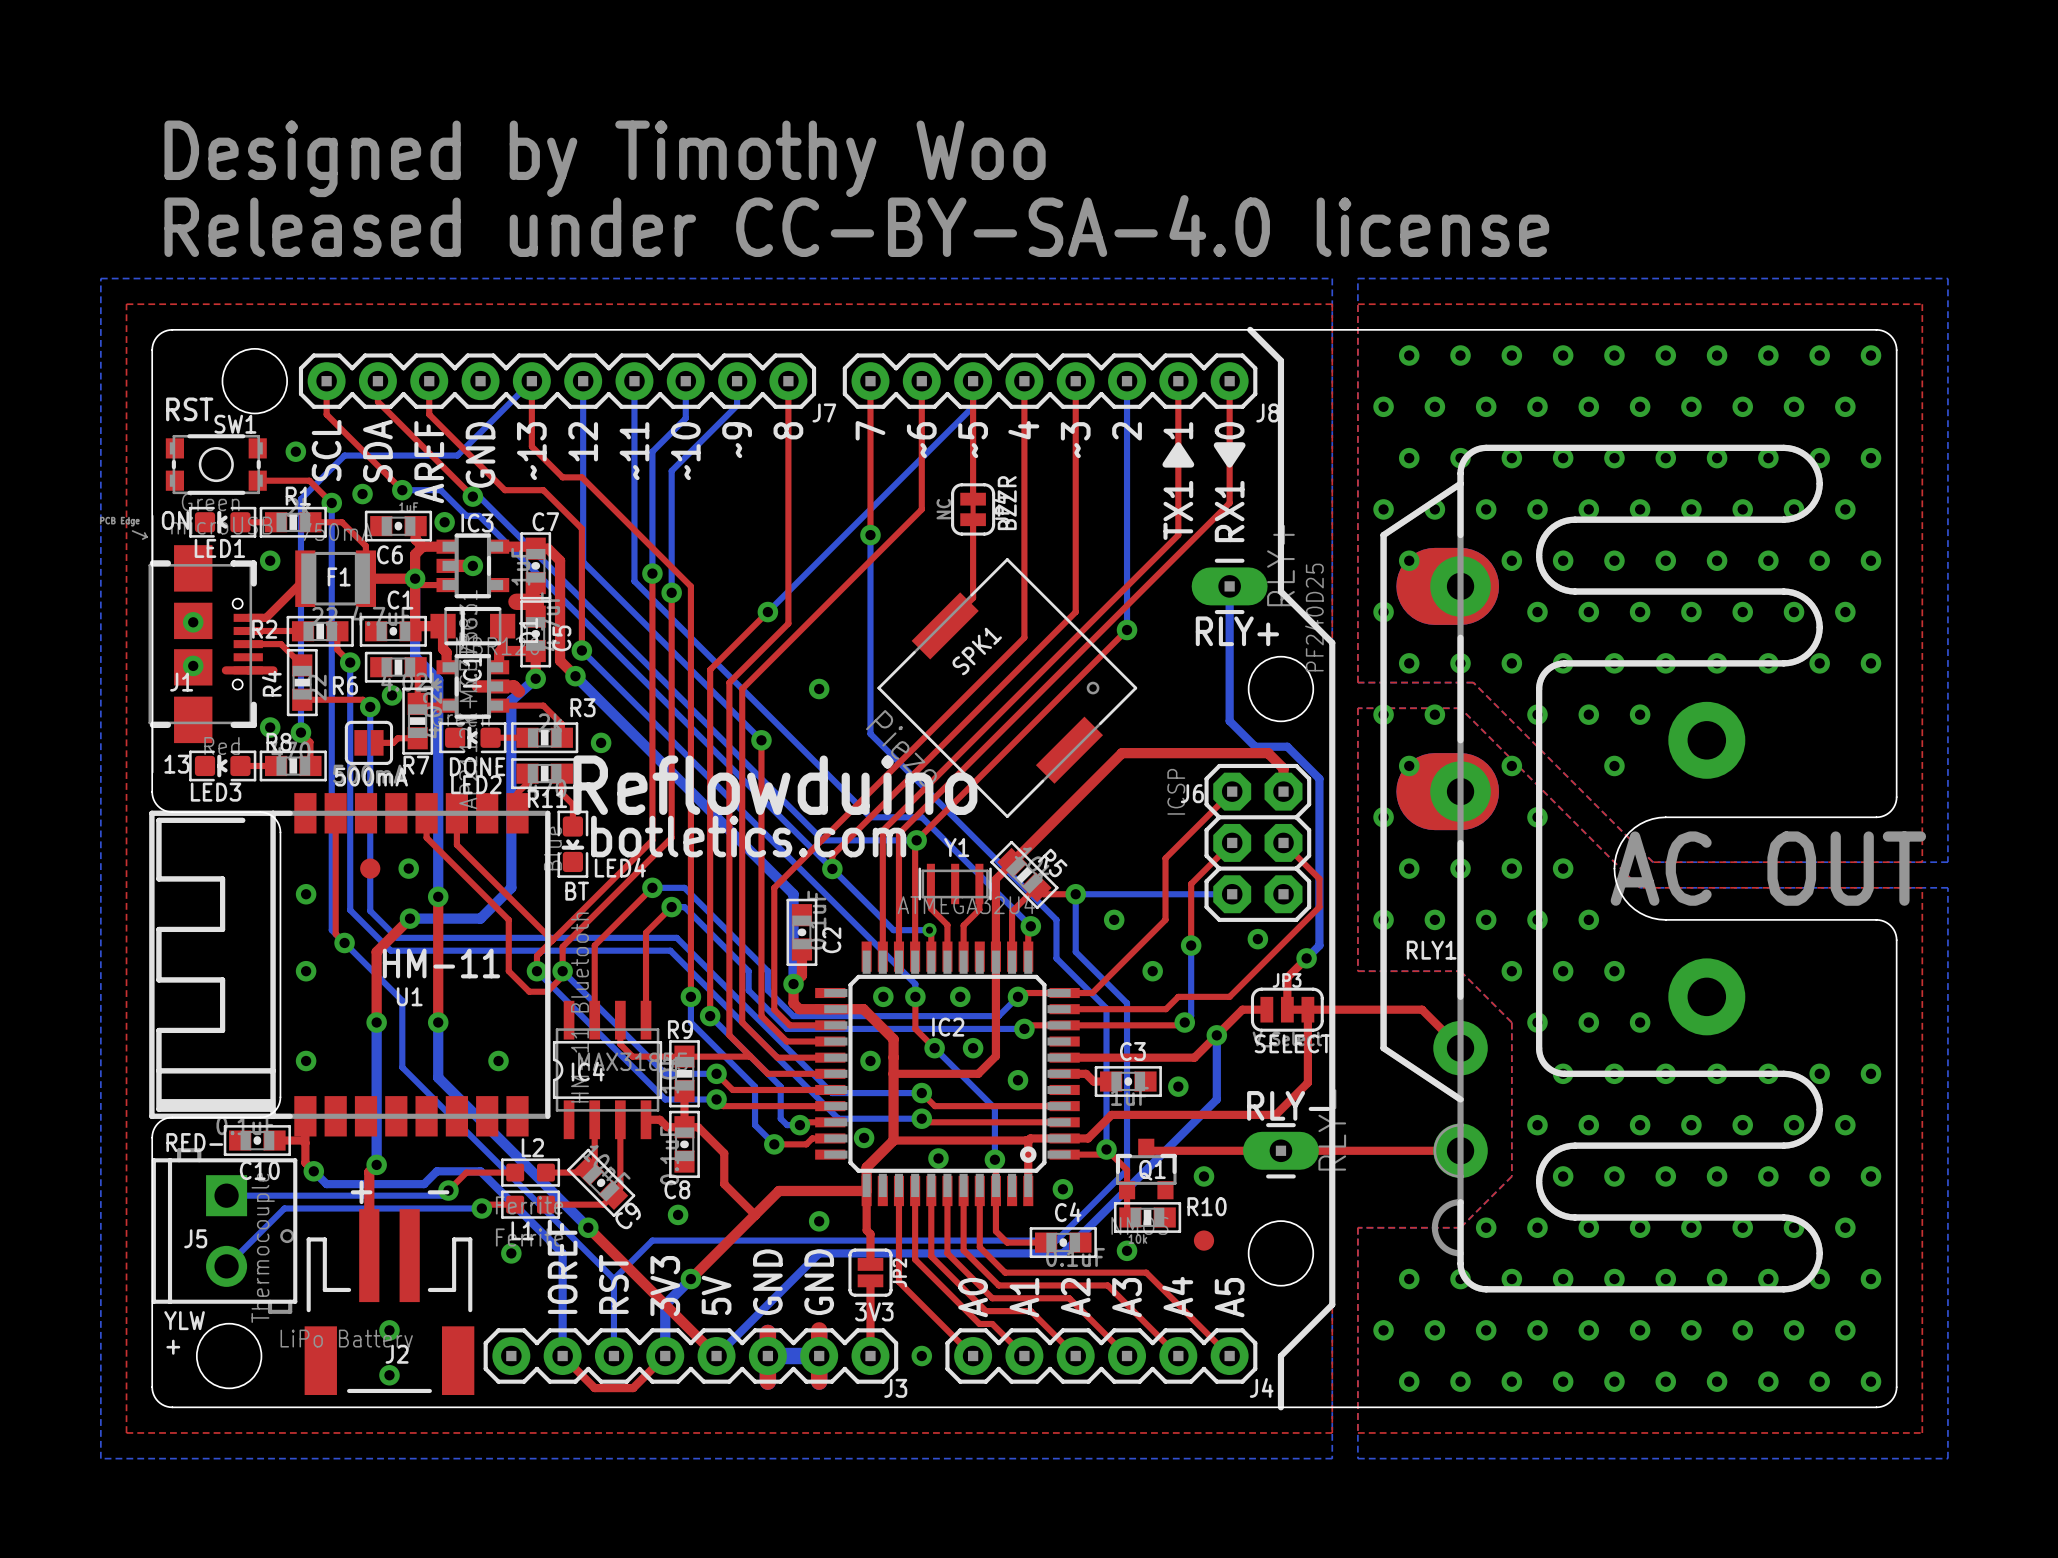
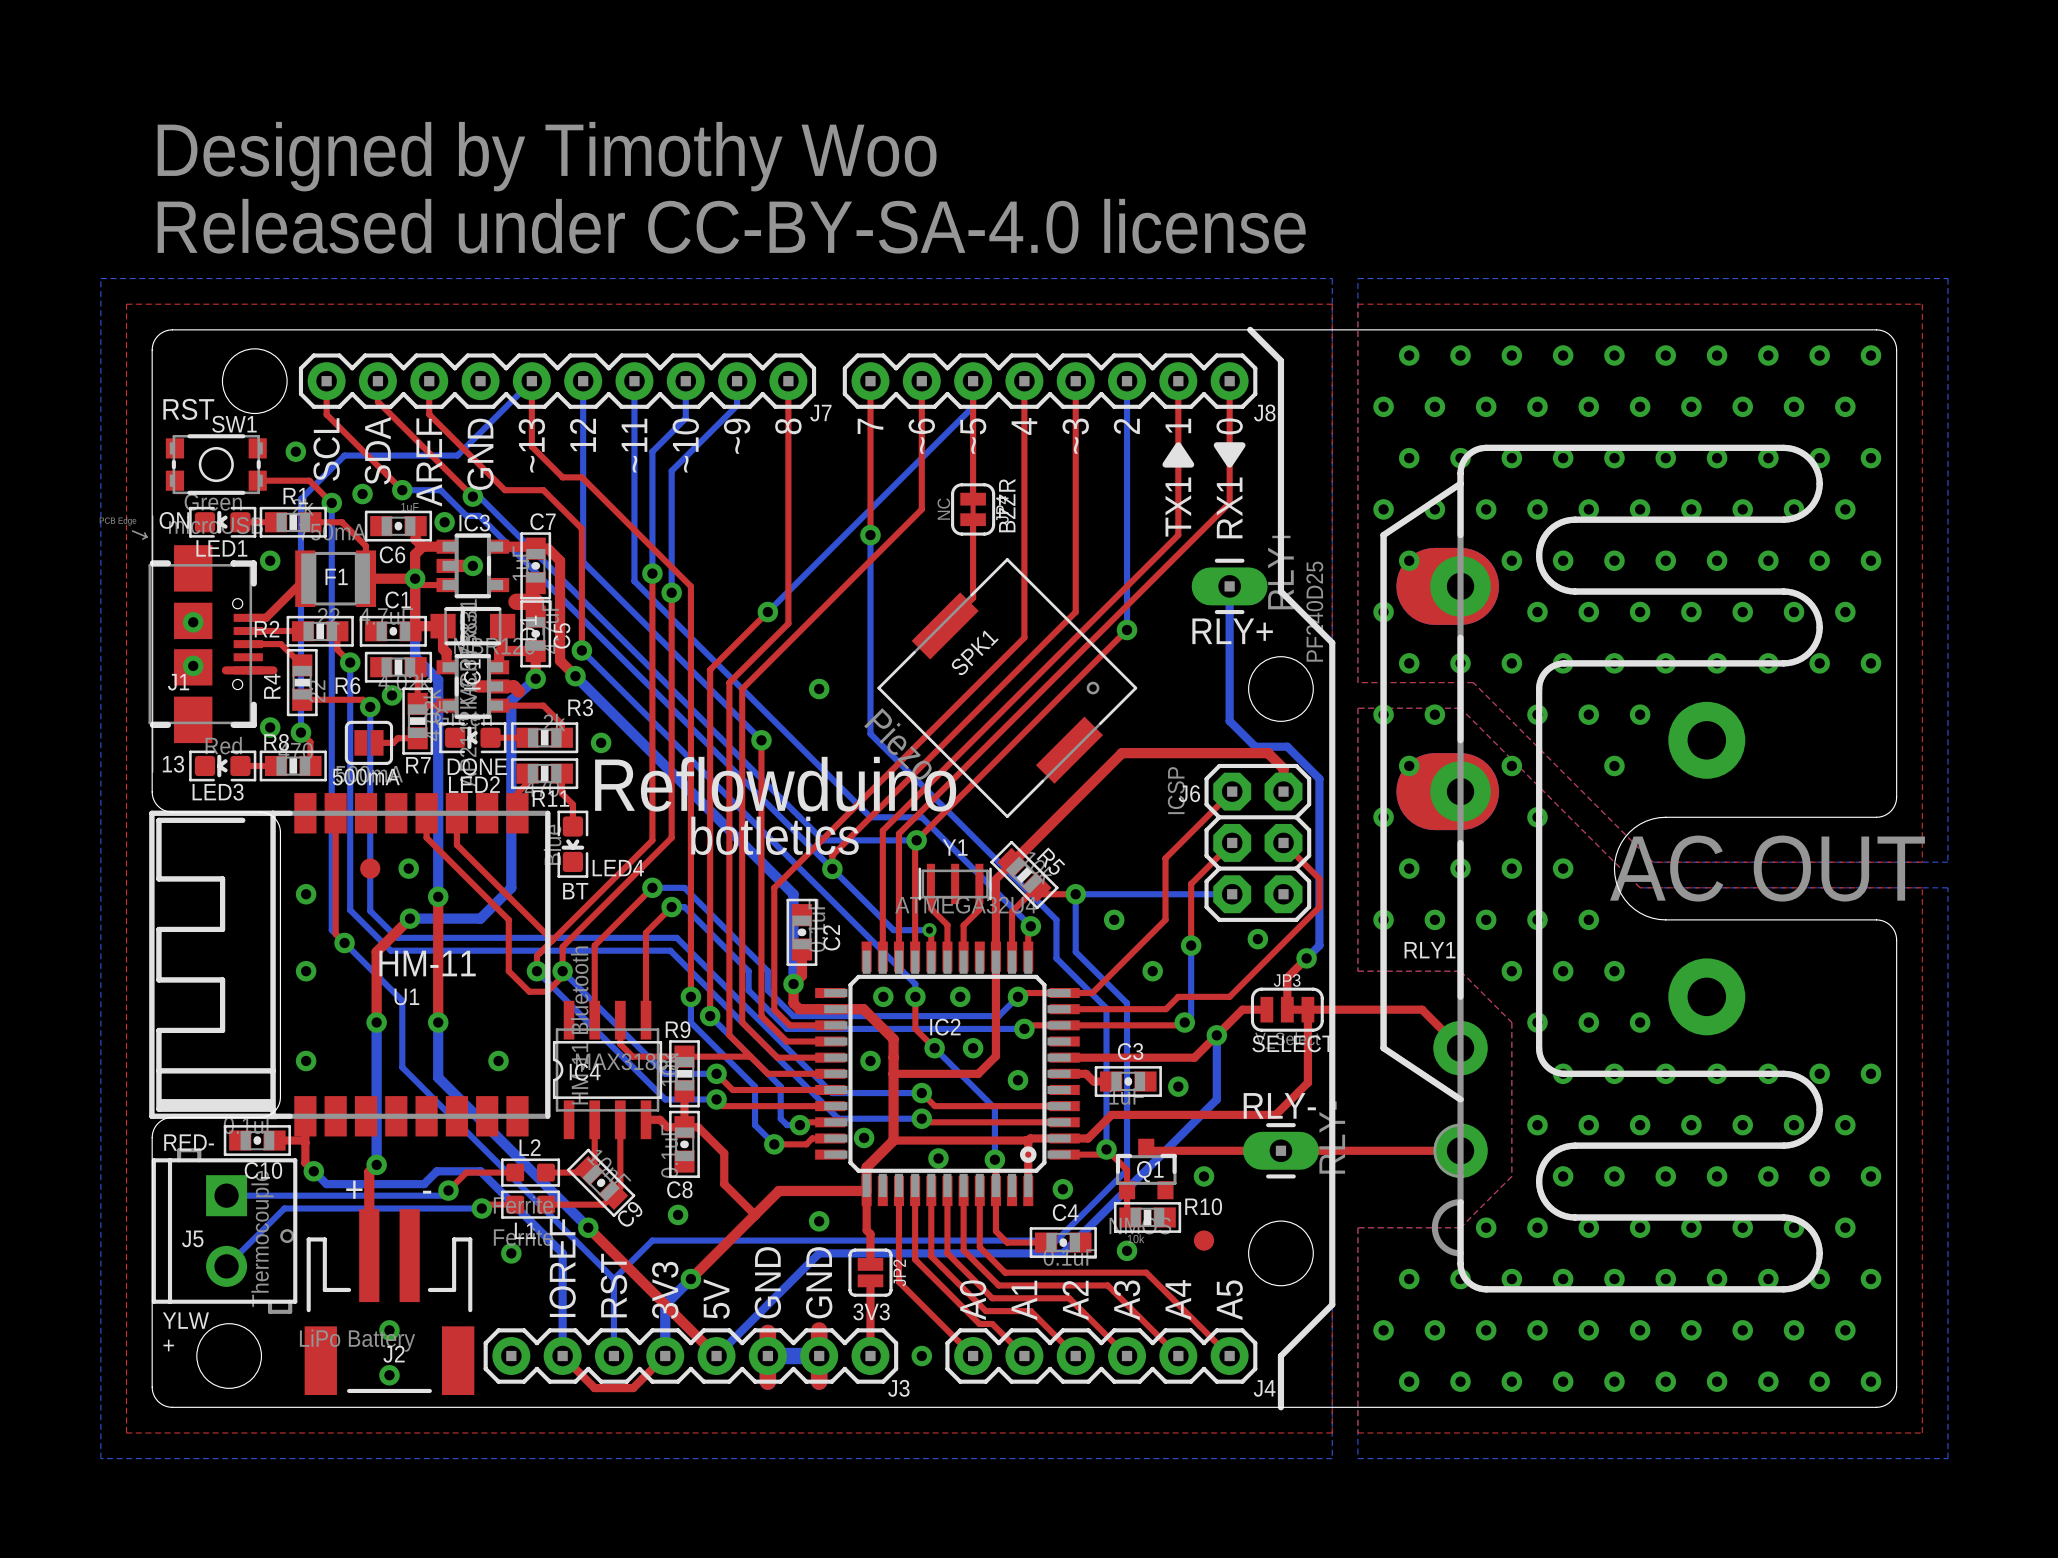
text: botletics.com (748, 836) -> botletics (774, 835)

